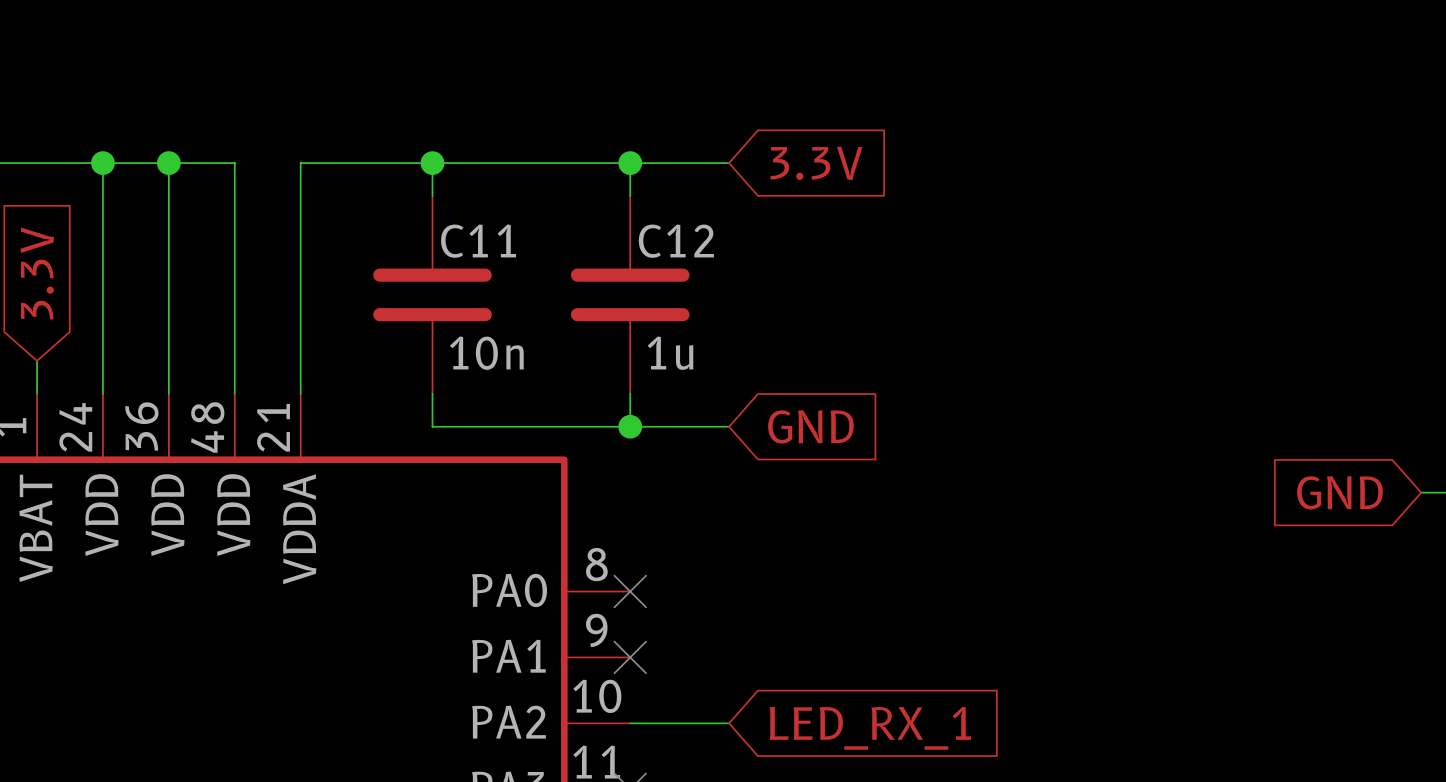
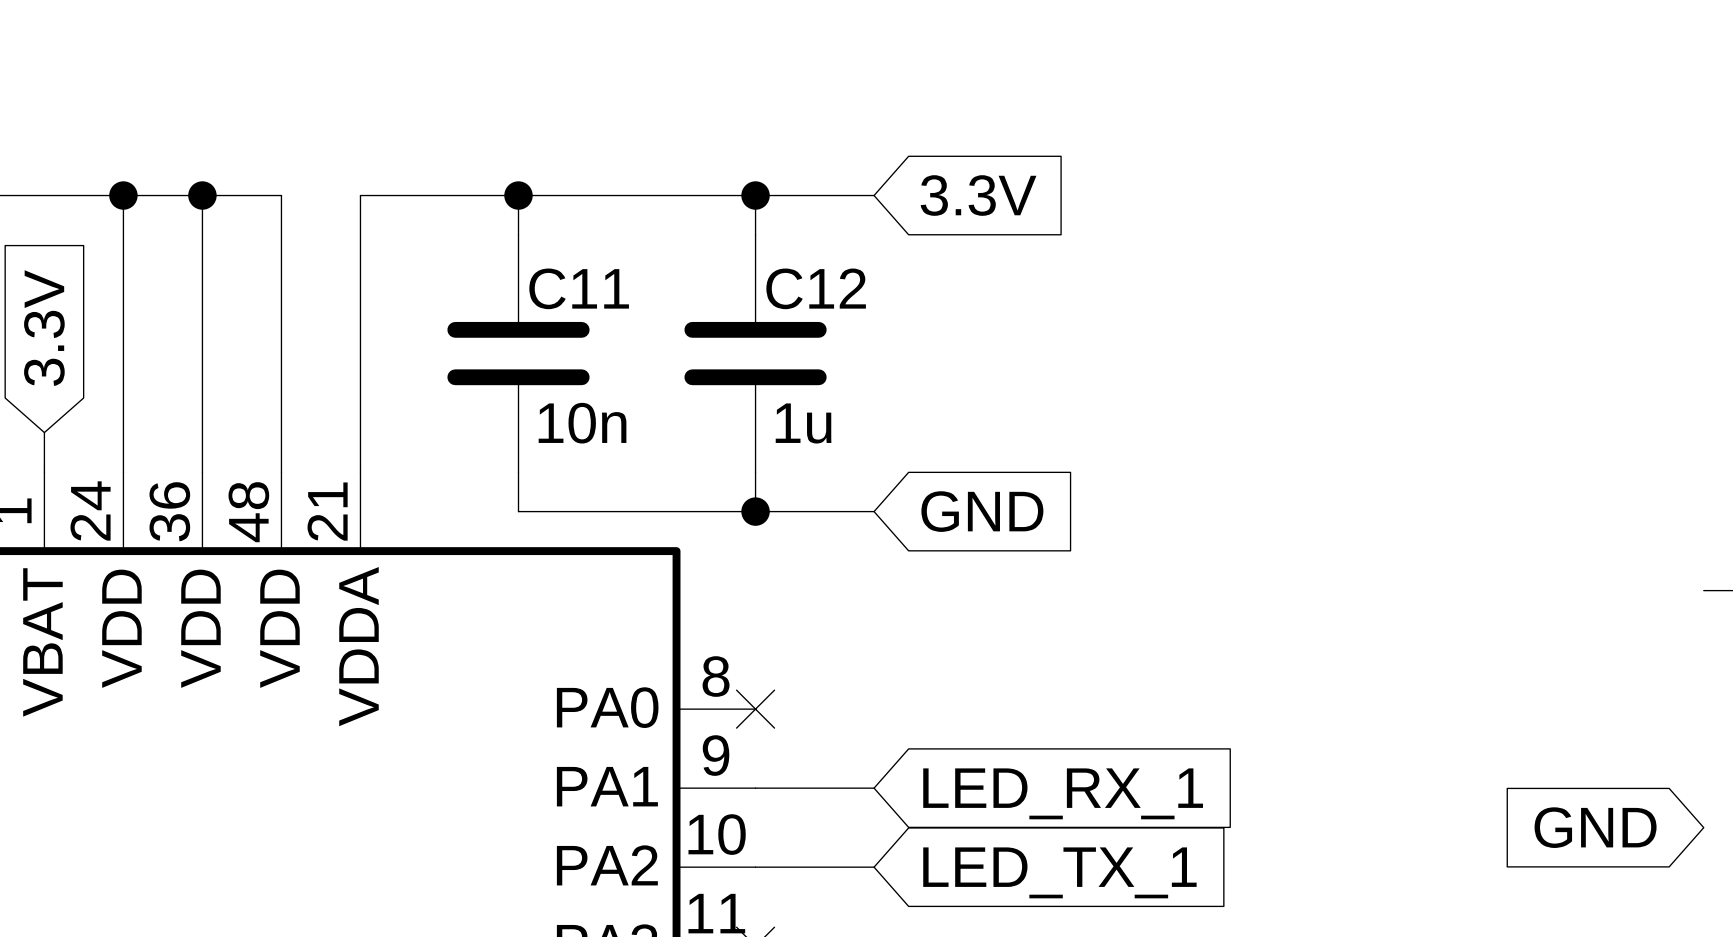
global label position: GND (1339, 492) -> GND (1595, 827)
wire: none -> (755, 788) (874, 788)
no-connect mark: (630, 657) -> none
global label: none -> LED_RX_1 (1063, 793)
global label: LED_RX_1 (870, 728) -> LED_TX_1 (1059, 872)

